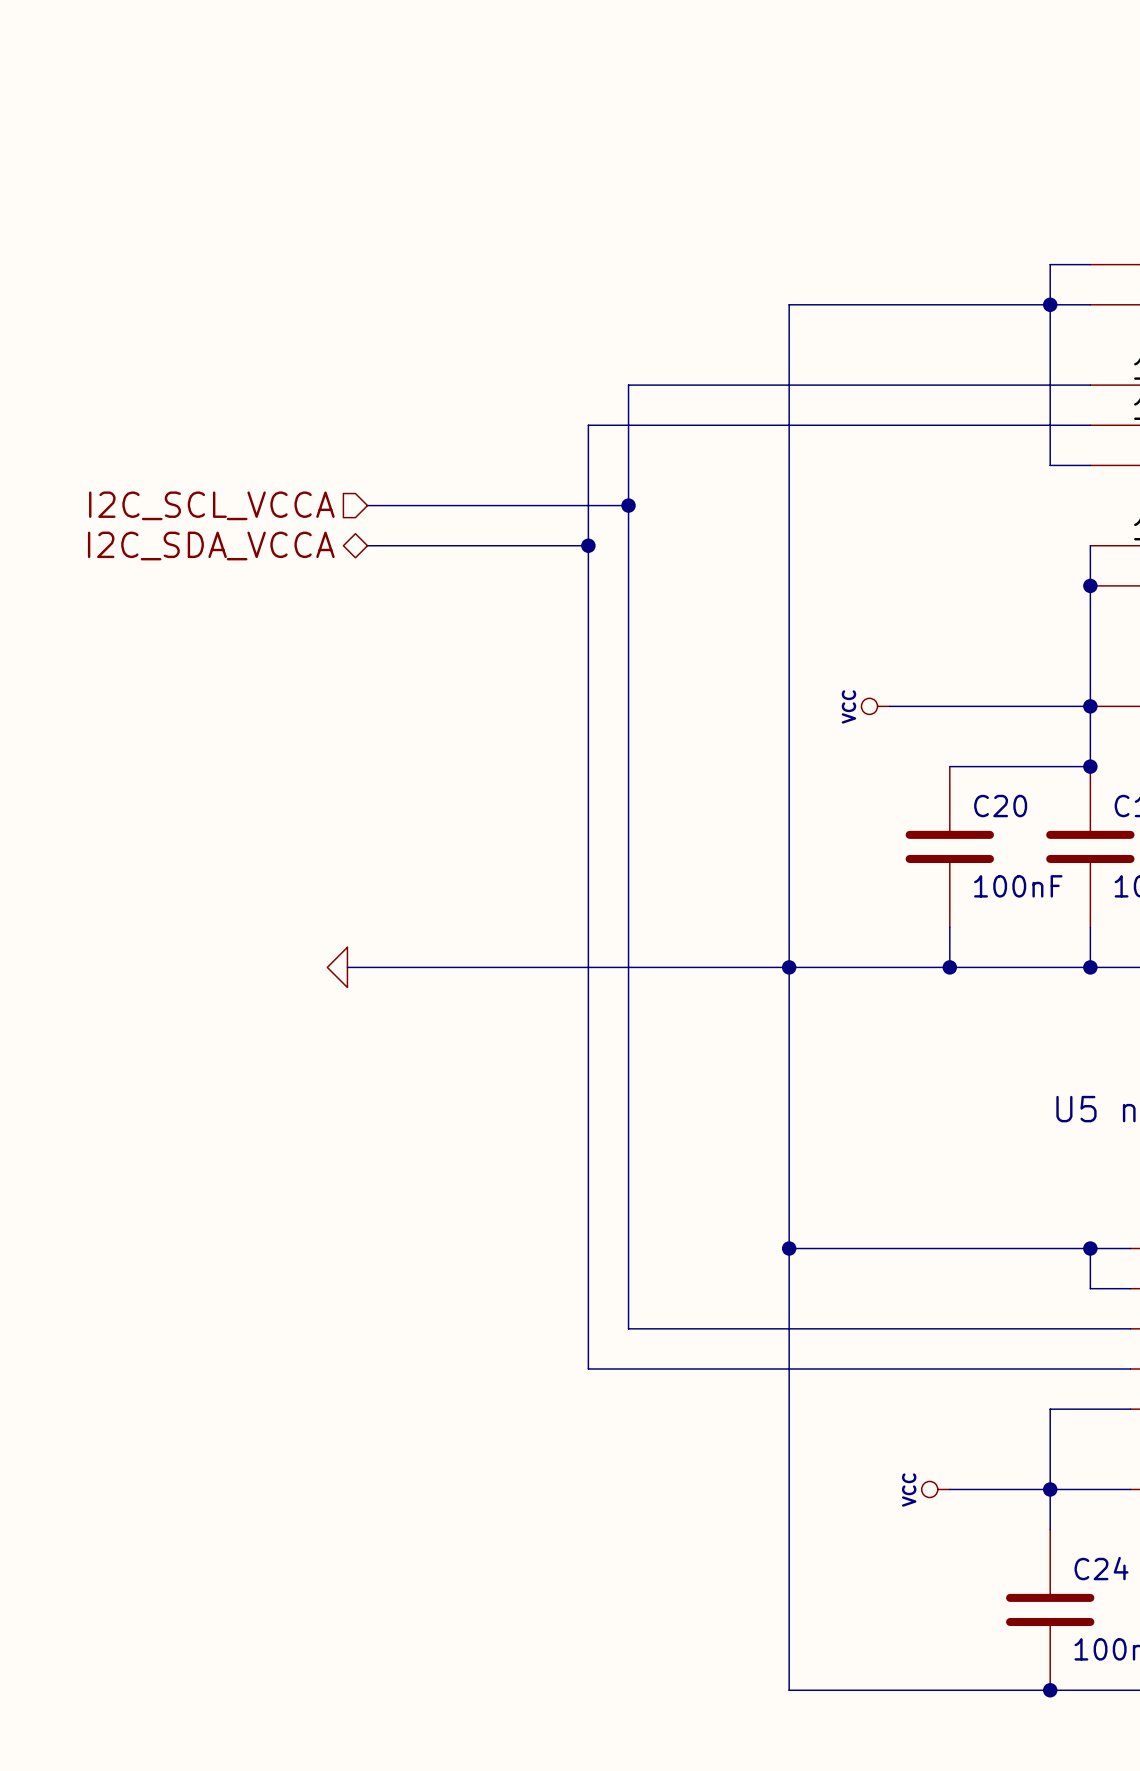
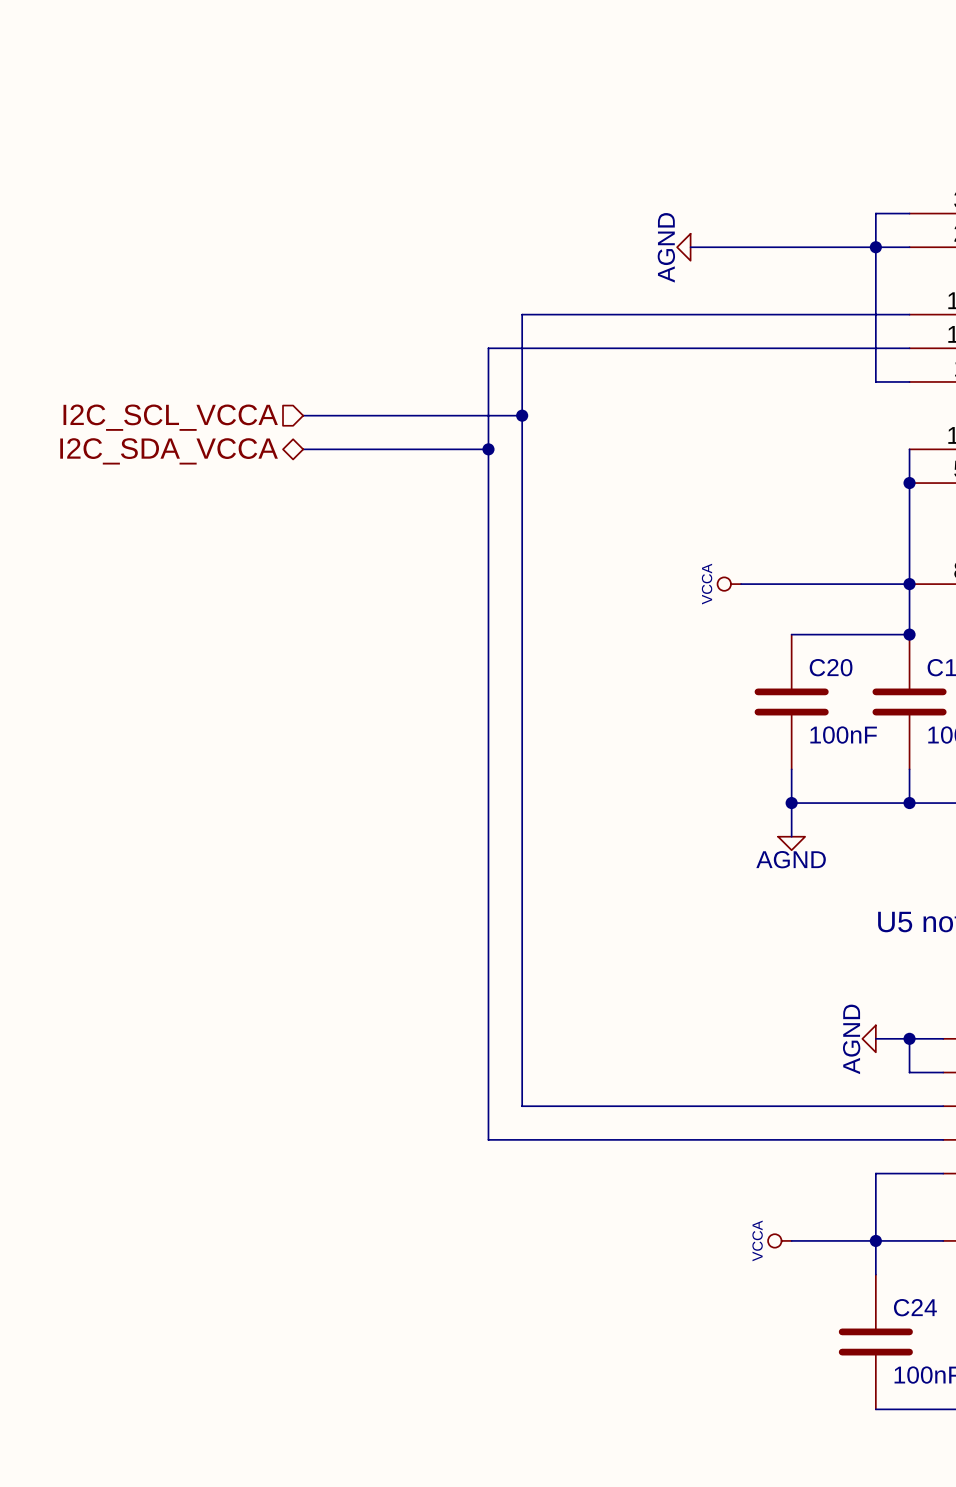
power symbol: none -> AGND (683, 247)
wire: (829, 304) (789, 304) (789, 1690) (1050, 1690) -> none
power symbol: VCC (875, 706) -> VCCA (729, 584)
power symbol: (337, 967) -> none
wire: (347, 967) (949, 967) -> (791, 836) (791, 803)
junction: (789, 967) -> none
power symbol: none -> AGND (791, 843)
wire: (789, 1248) (1050, 1248) -> none
junction: (789, 1248) -> none
power symbol: none -> AGND (869, 1038)
power symbol: VCC (935, 1489) -> VCCA (779, 1240)
junction: (1050, 1690) -> none

